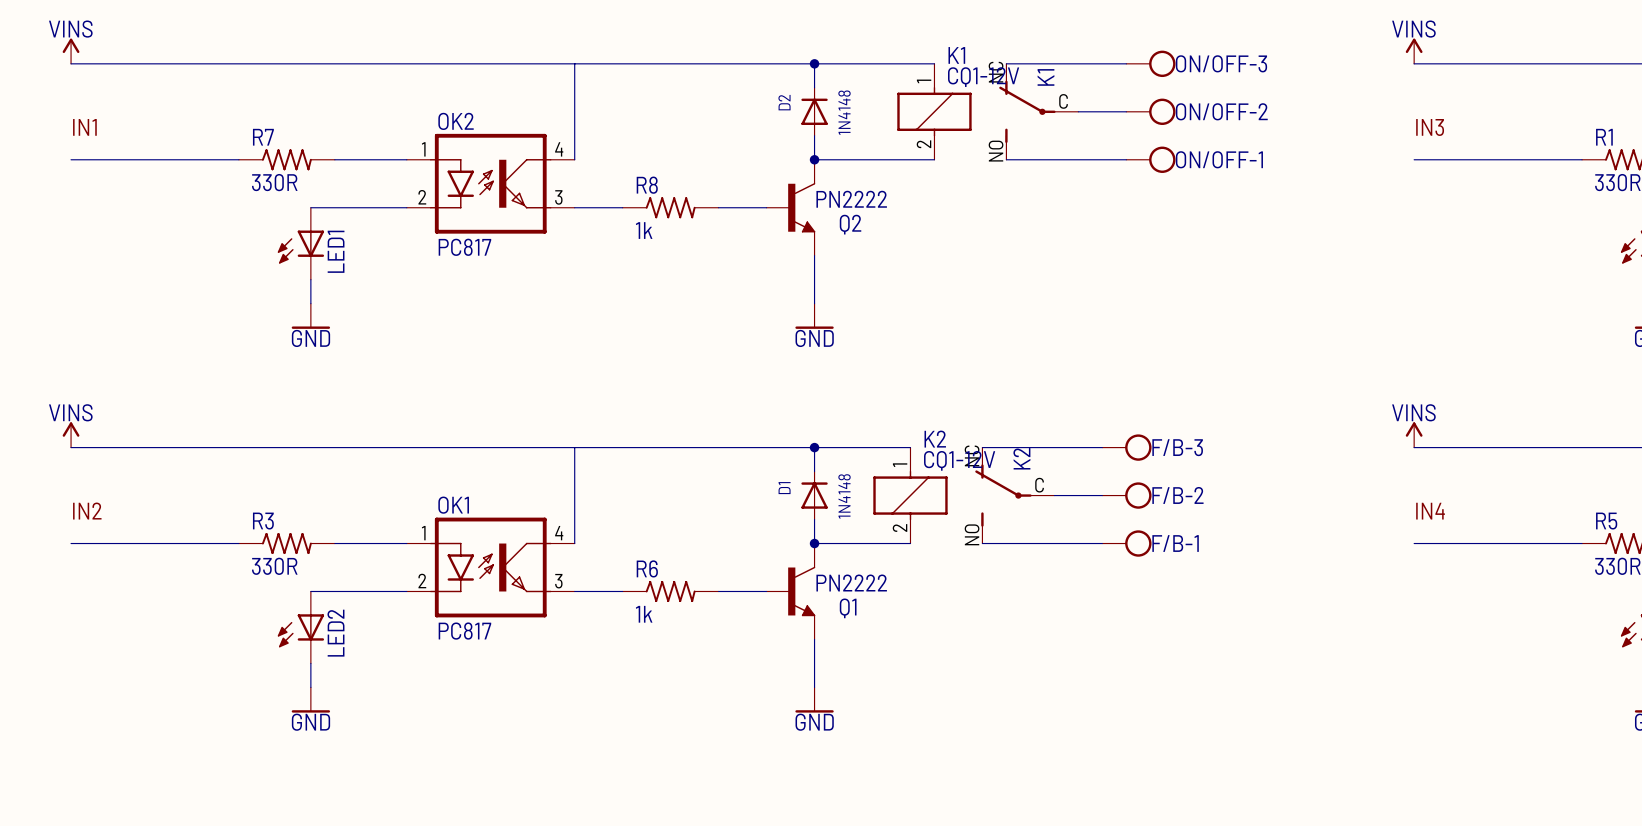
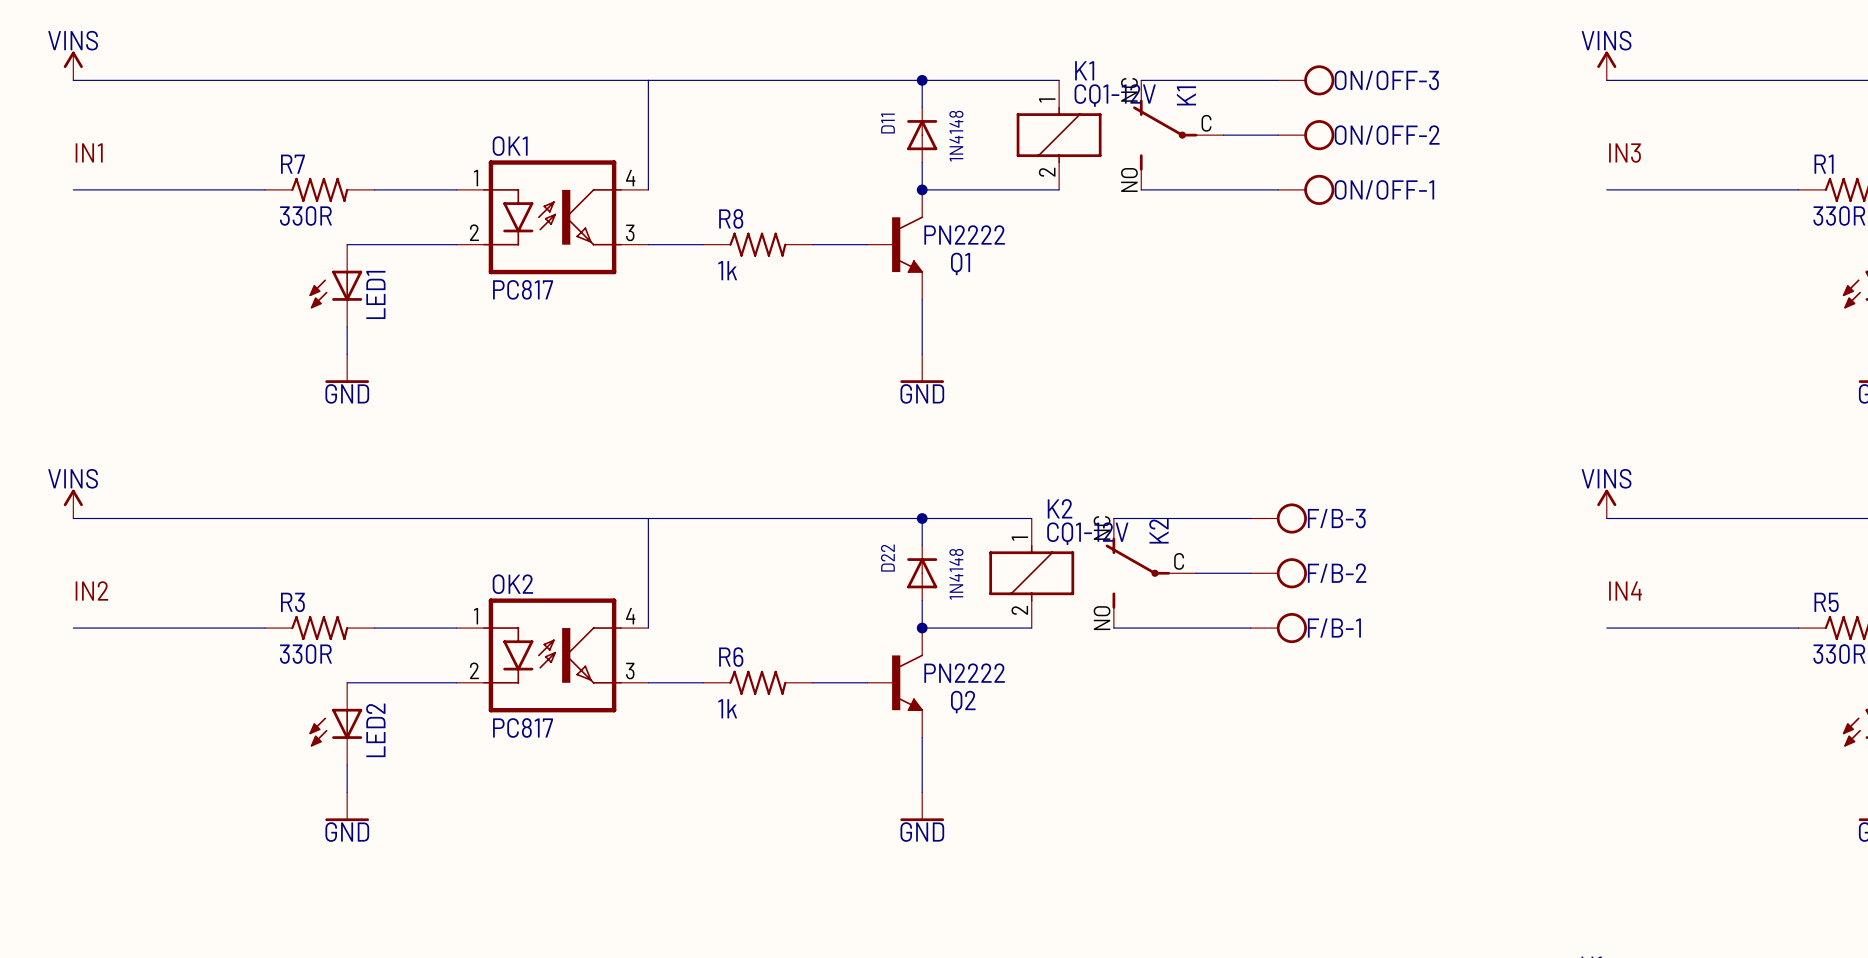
D2 name: D2 (784, 102) -> D11 (887, 123)
OK2 name: OK2 (456, 121) -> OK1 (510, 146)
Q2 name: Q2 (850, 224) -> Q1 (960, 263)
D1 name: D1 (784, 488) -> D22 (887, 558)
OK1 name: OK1 (453, 505) -> OK2 (512, 584)
Q1 name: Q1 (848, 608) -> Q2 (963, 702)

